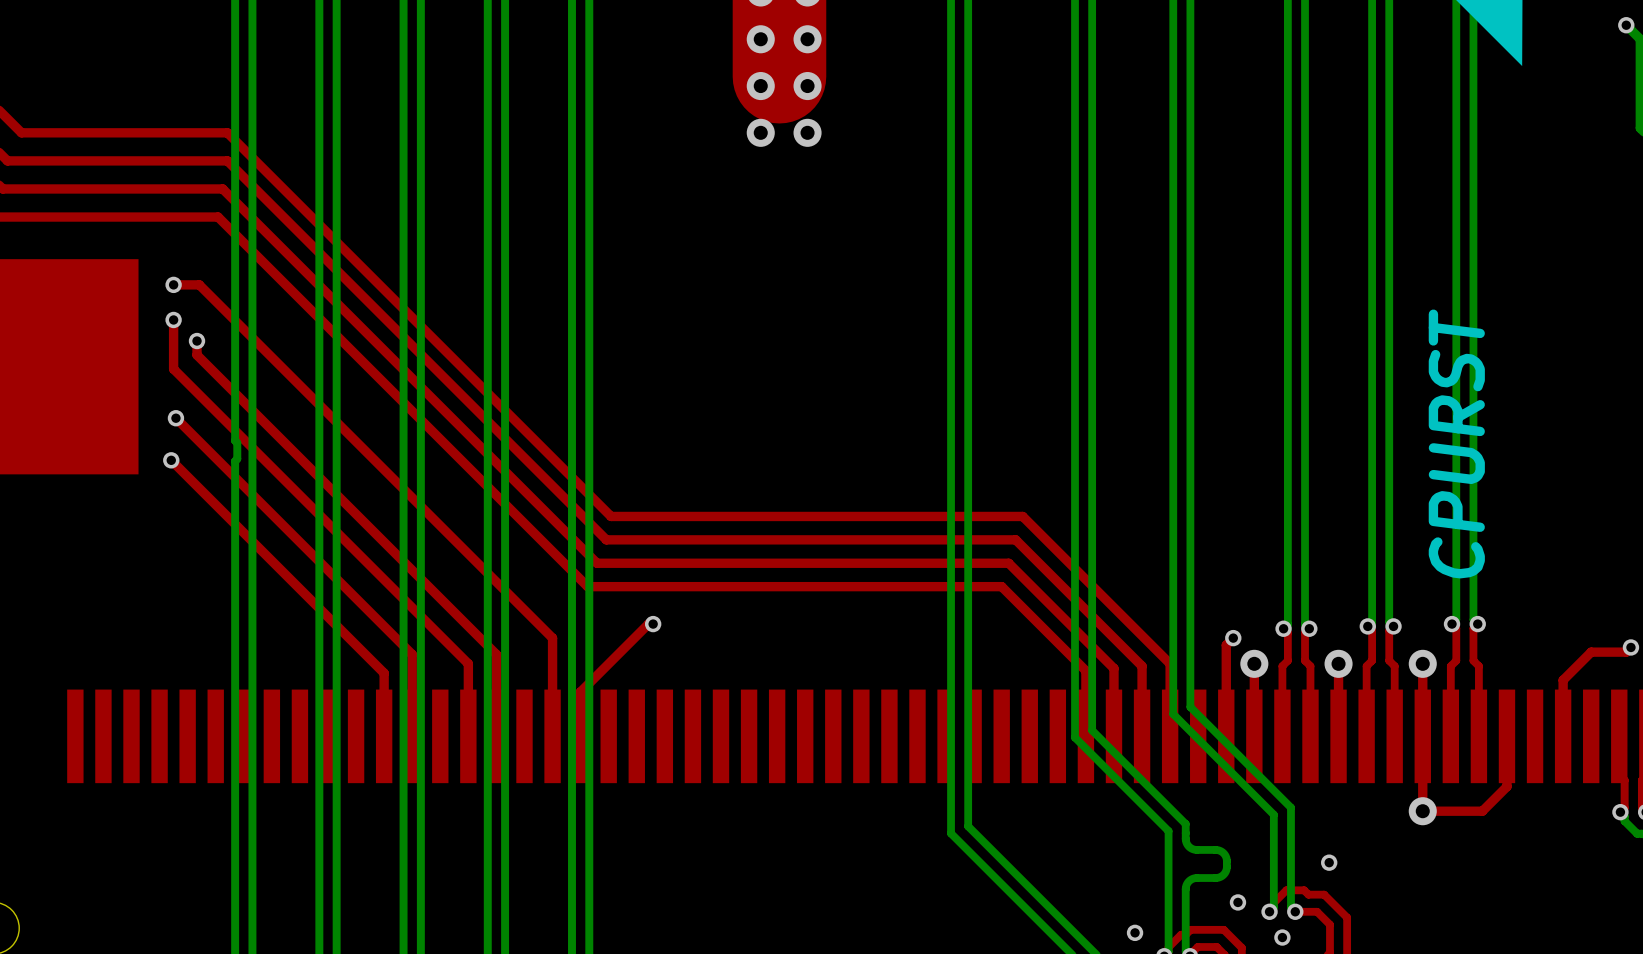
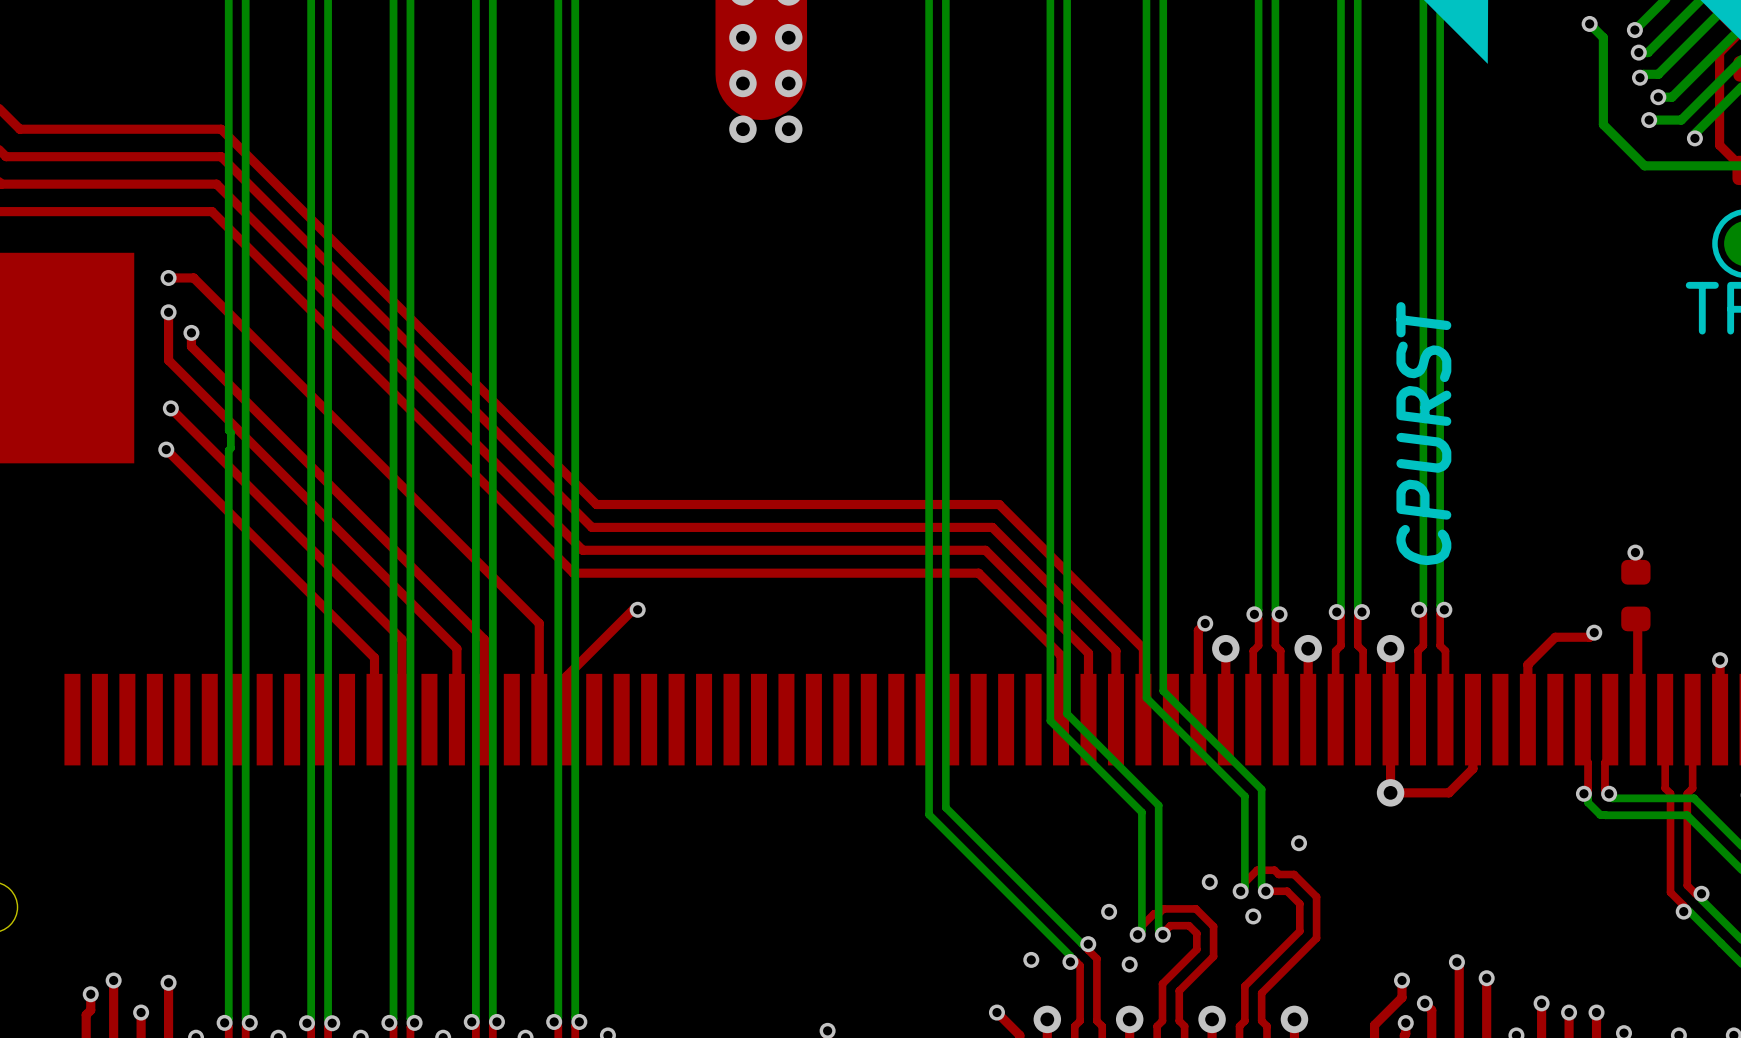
bottom track: (1185, 838) (1187, 844) (1192, 848) (1219, 850) (1225, 855) (1226, 861) (1226, 870) (1221, 876) (1193, 878) (1188, 882) (1185, 889) -> (1158, 819) (1158, 869)

